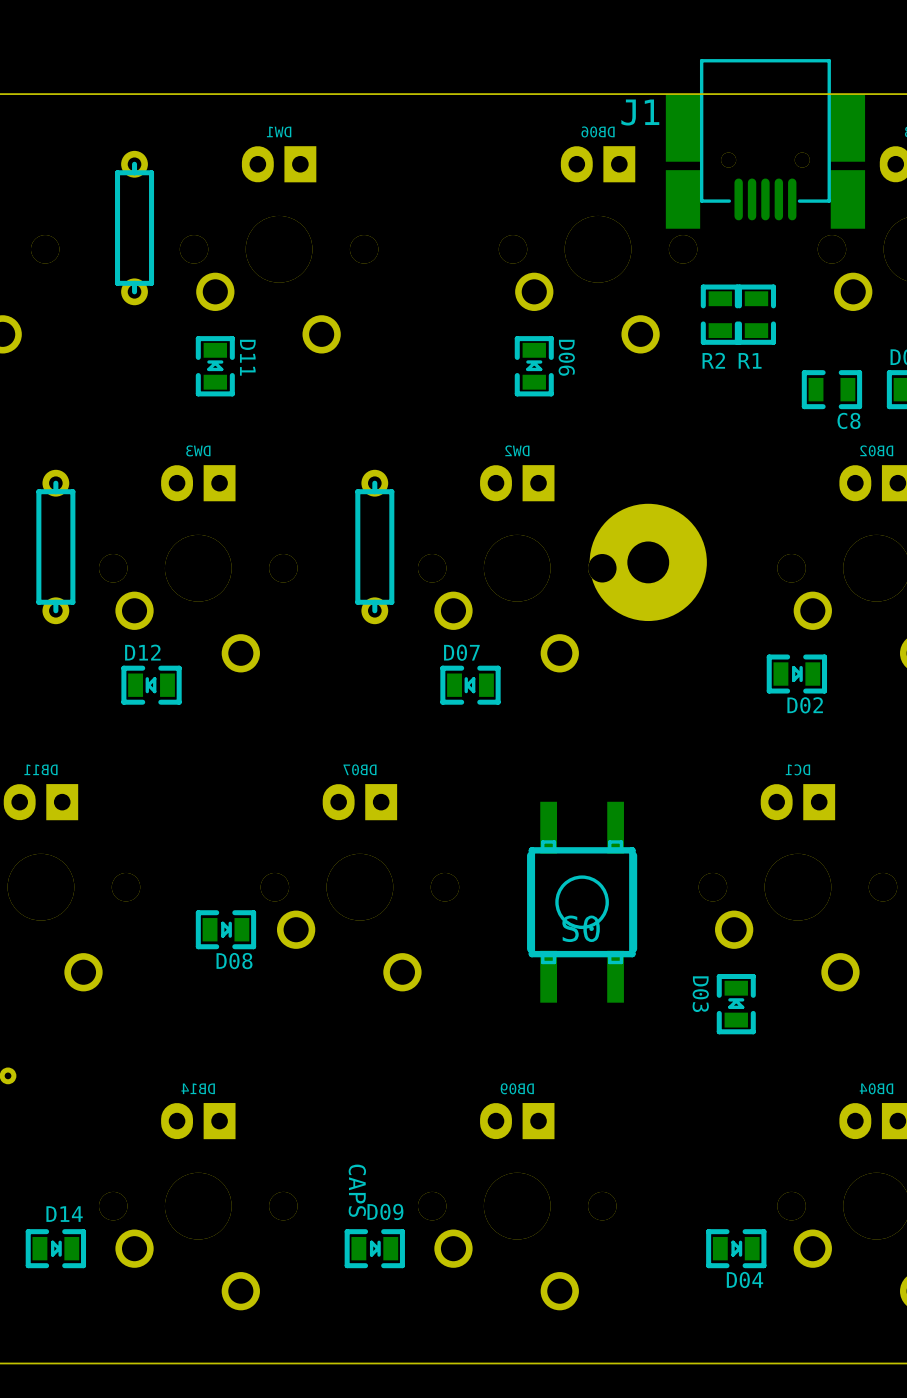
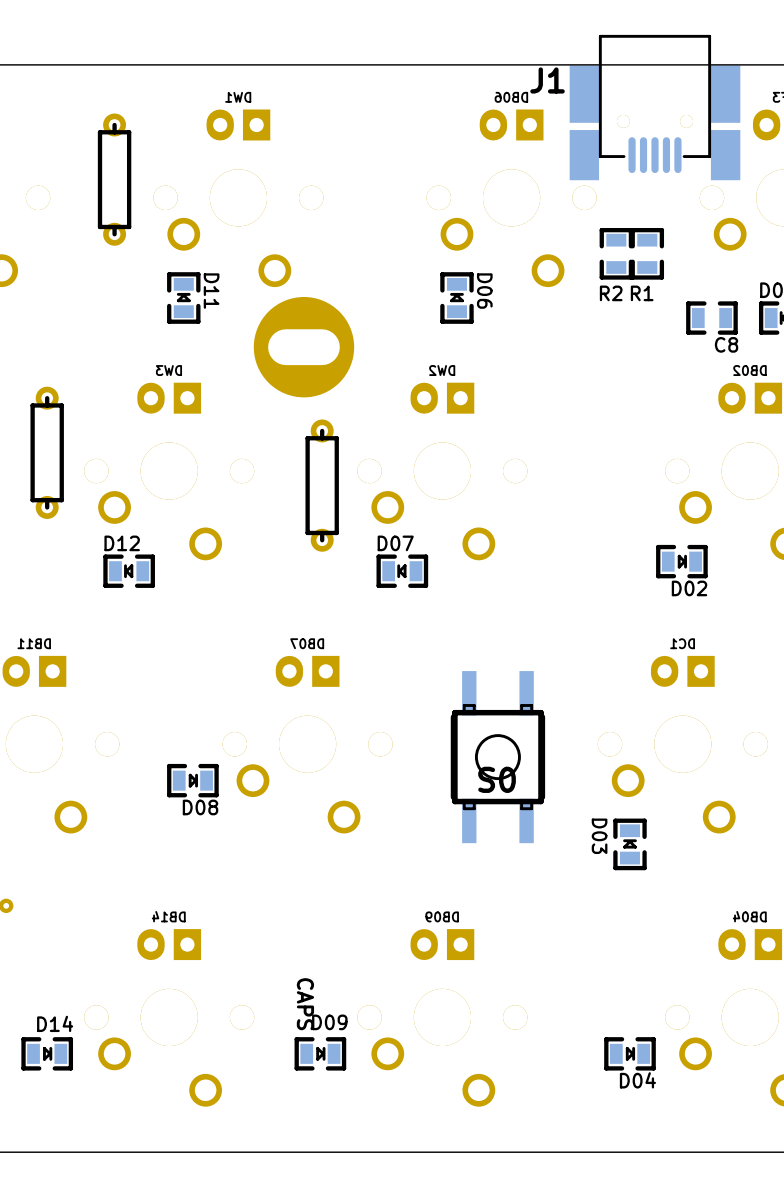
part: none -> (303, 347)
part position: (374, 546) -> (322, 485)
part: (648, 562) -> none

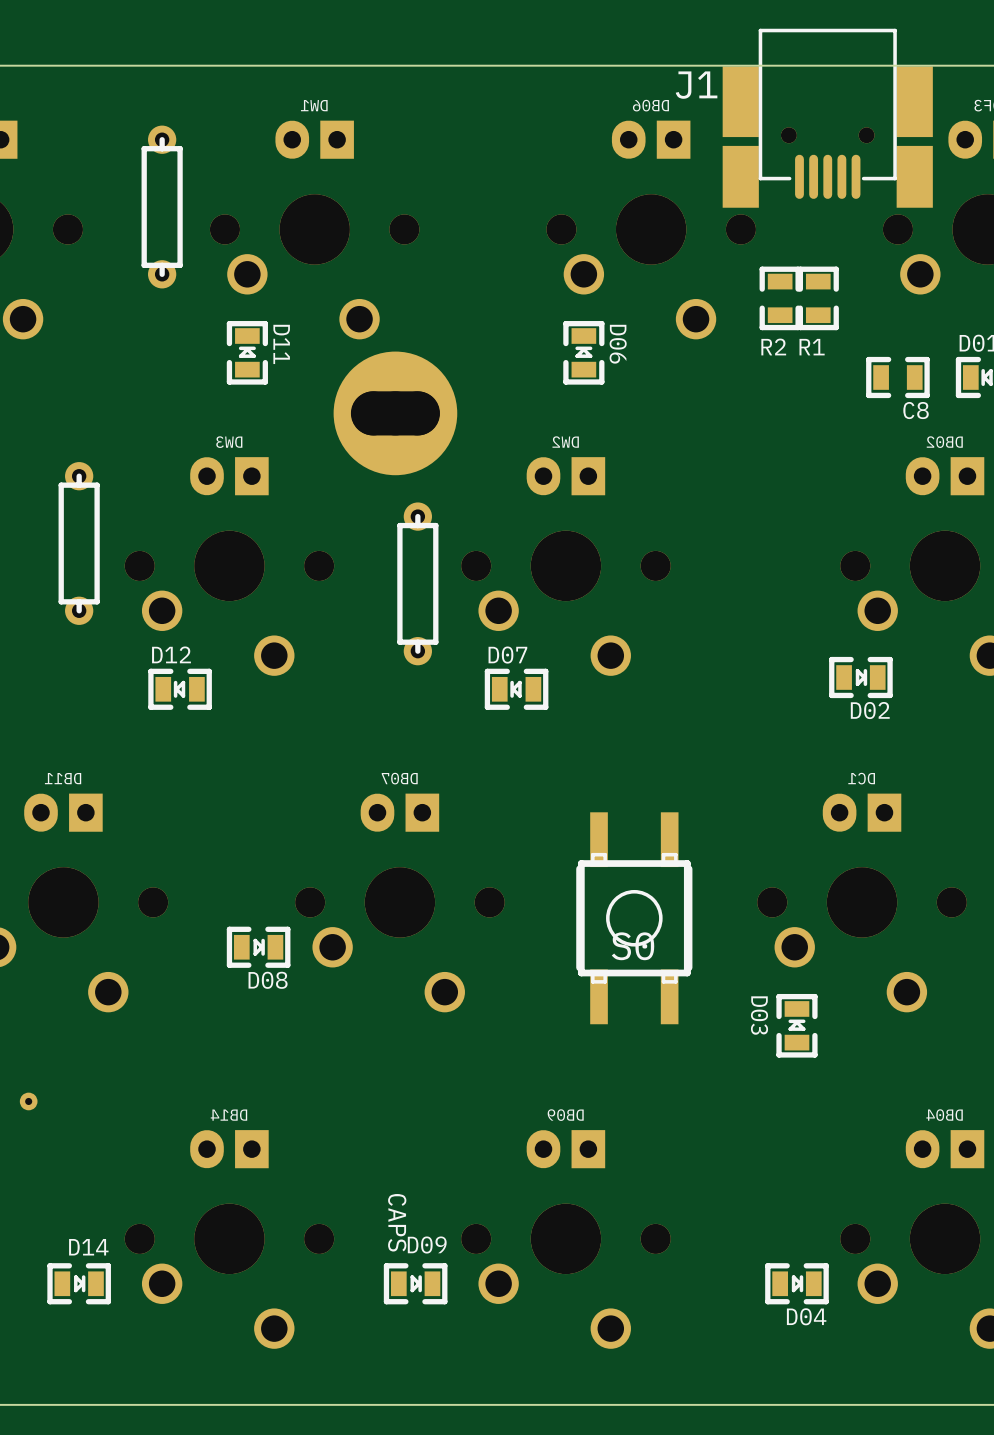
part footprint: [253, 296, 355, 398] -> [333, 351, 458, 476]

